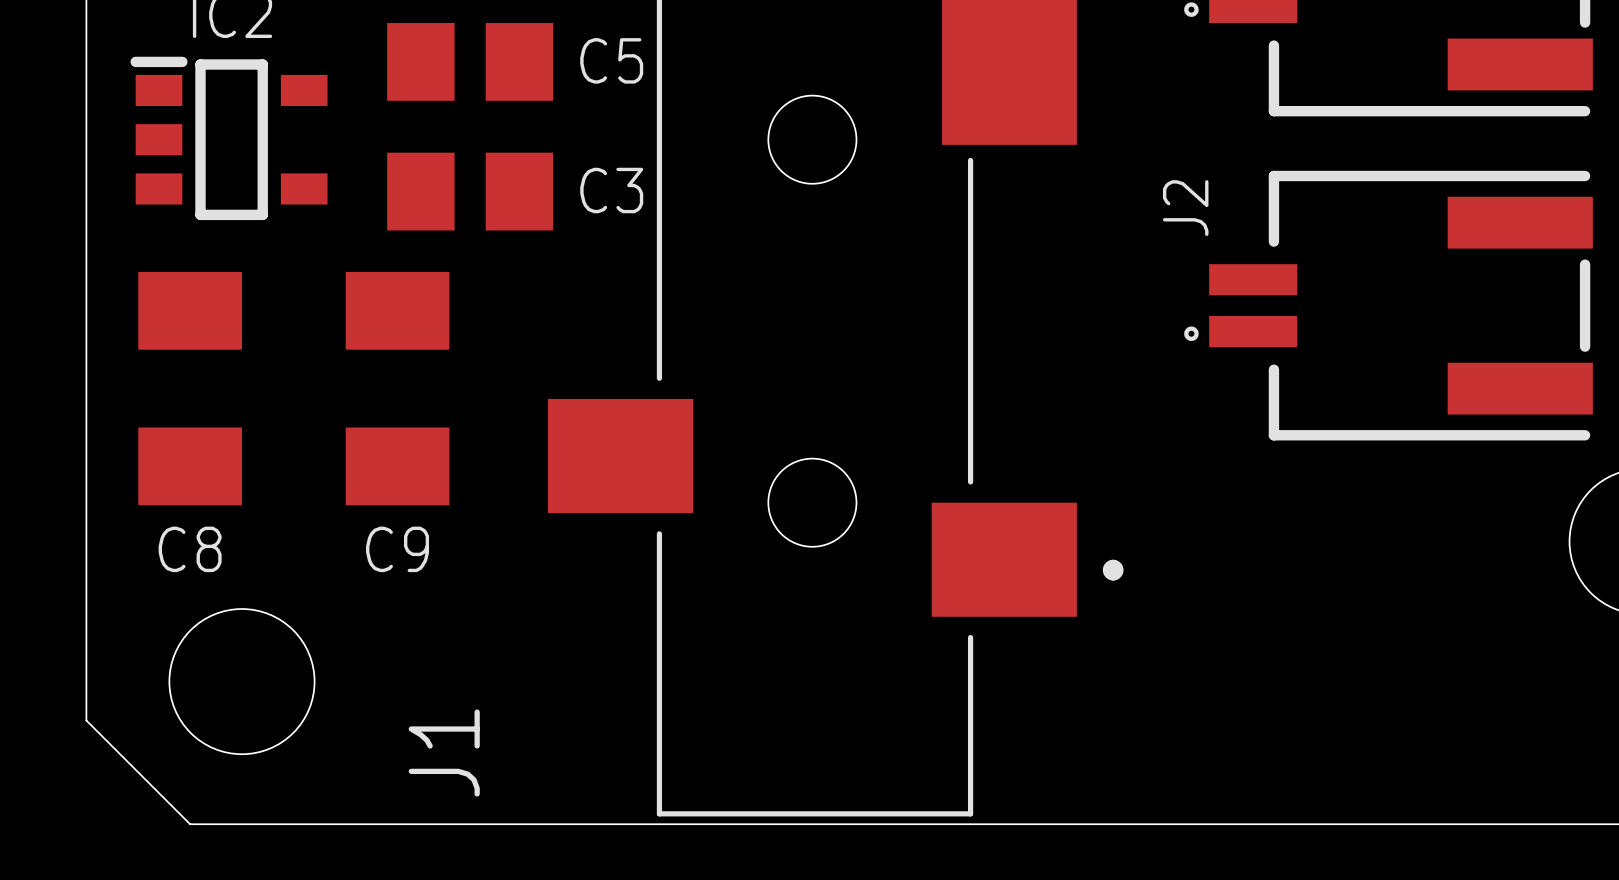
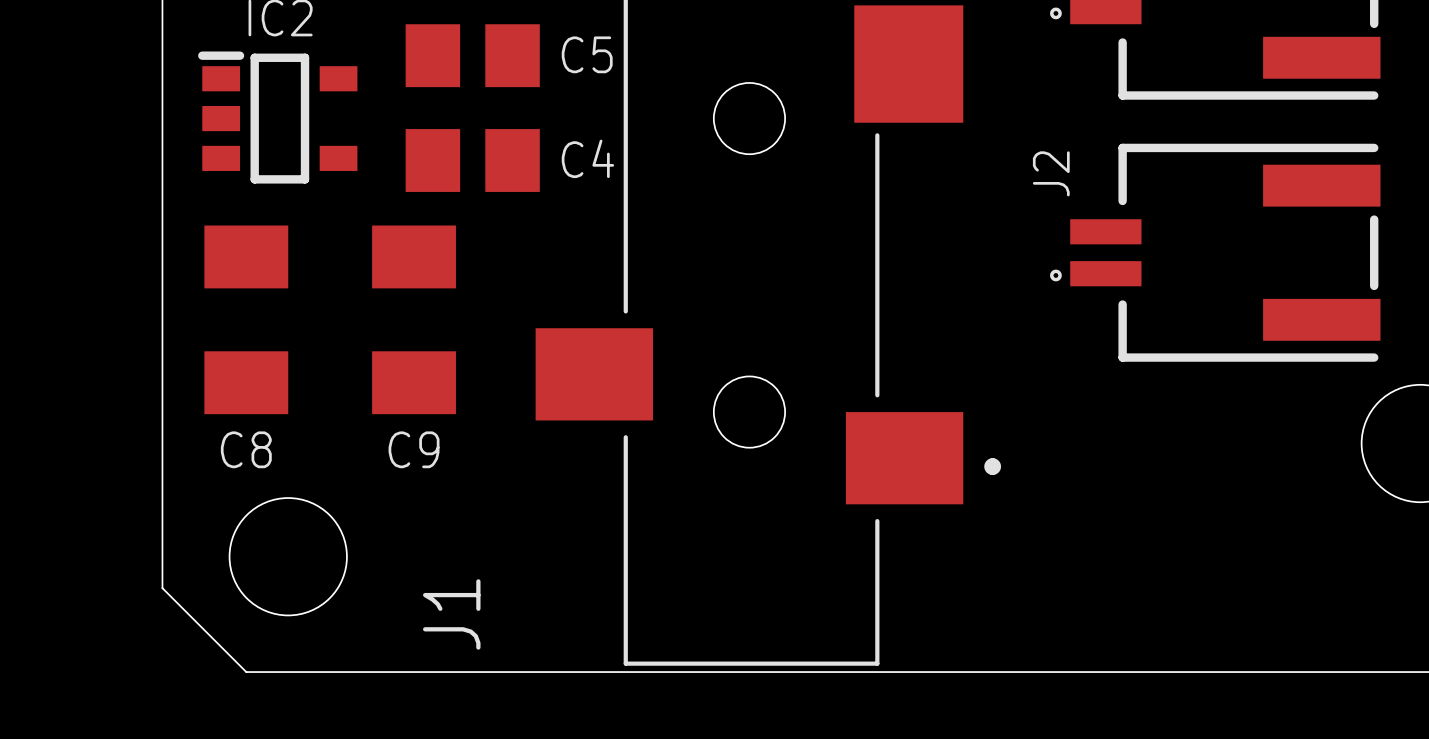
C3 name: C3 (611, 190) -> C4 (587, 158)

